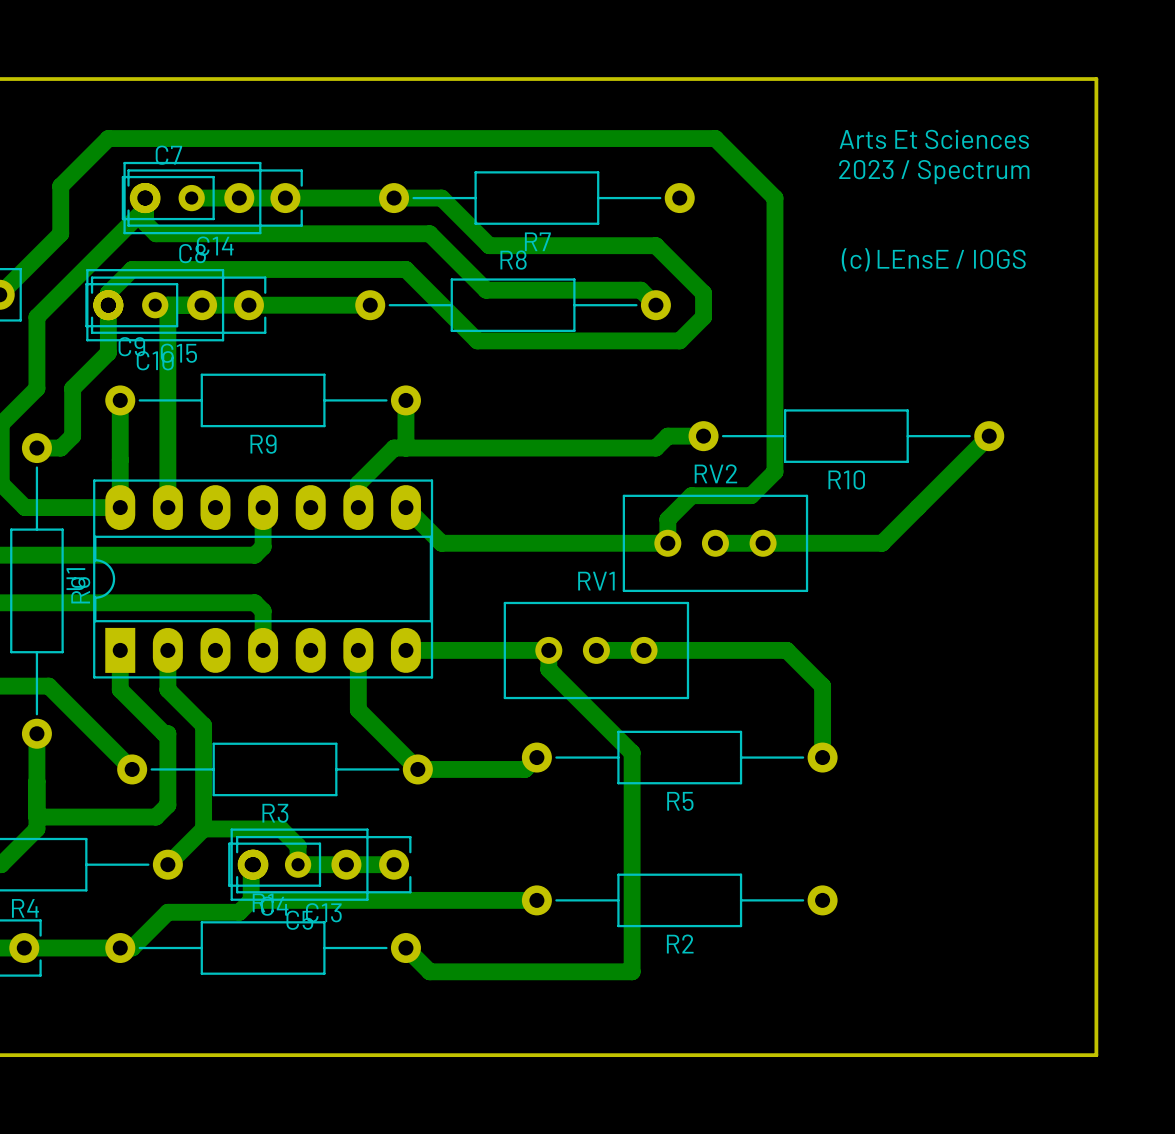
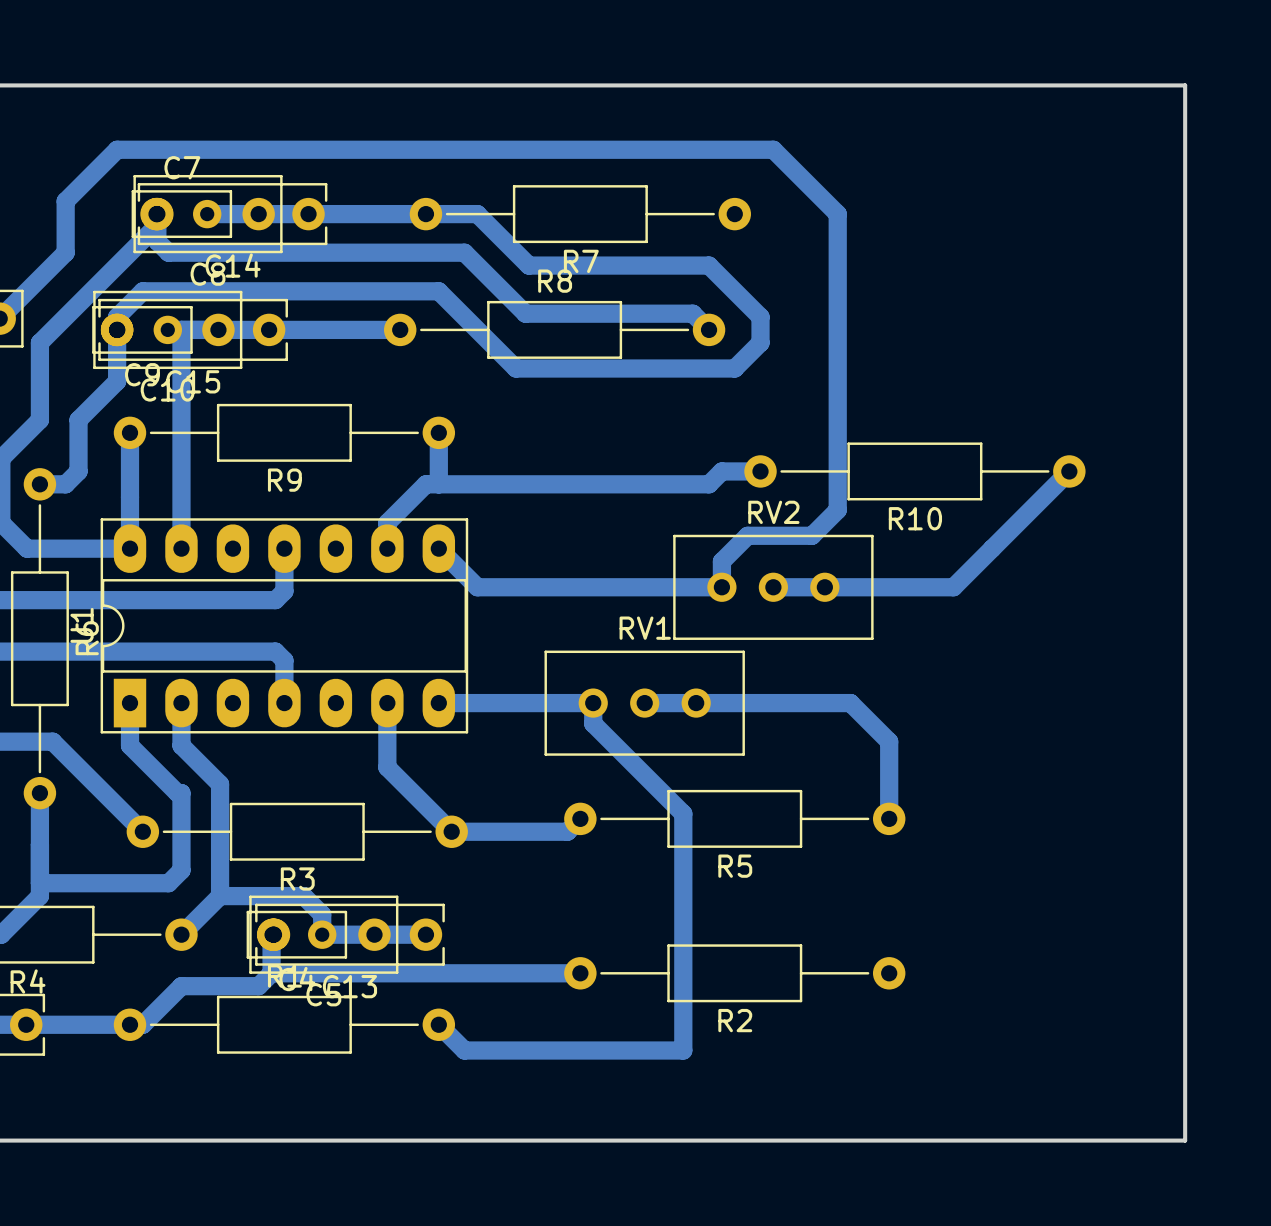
text: Arts Et Sciences (934, 139) -> none
text: 2023 / Spectrum (934, 172) -> none
text: (c) LEnsE / IOGS (933, 259) -> none

